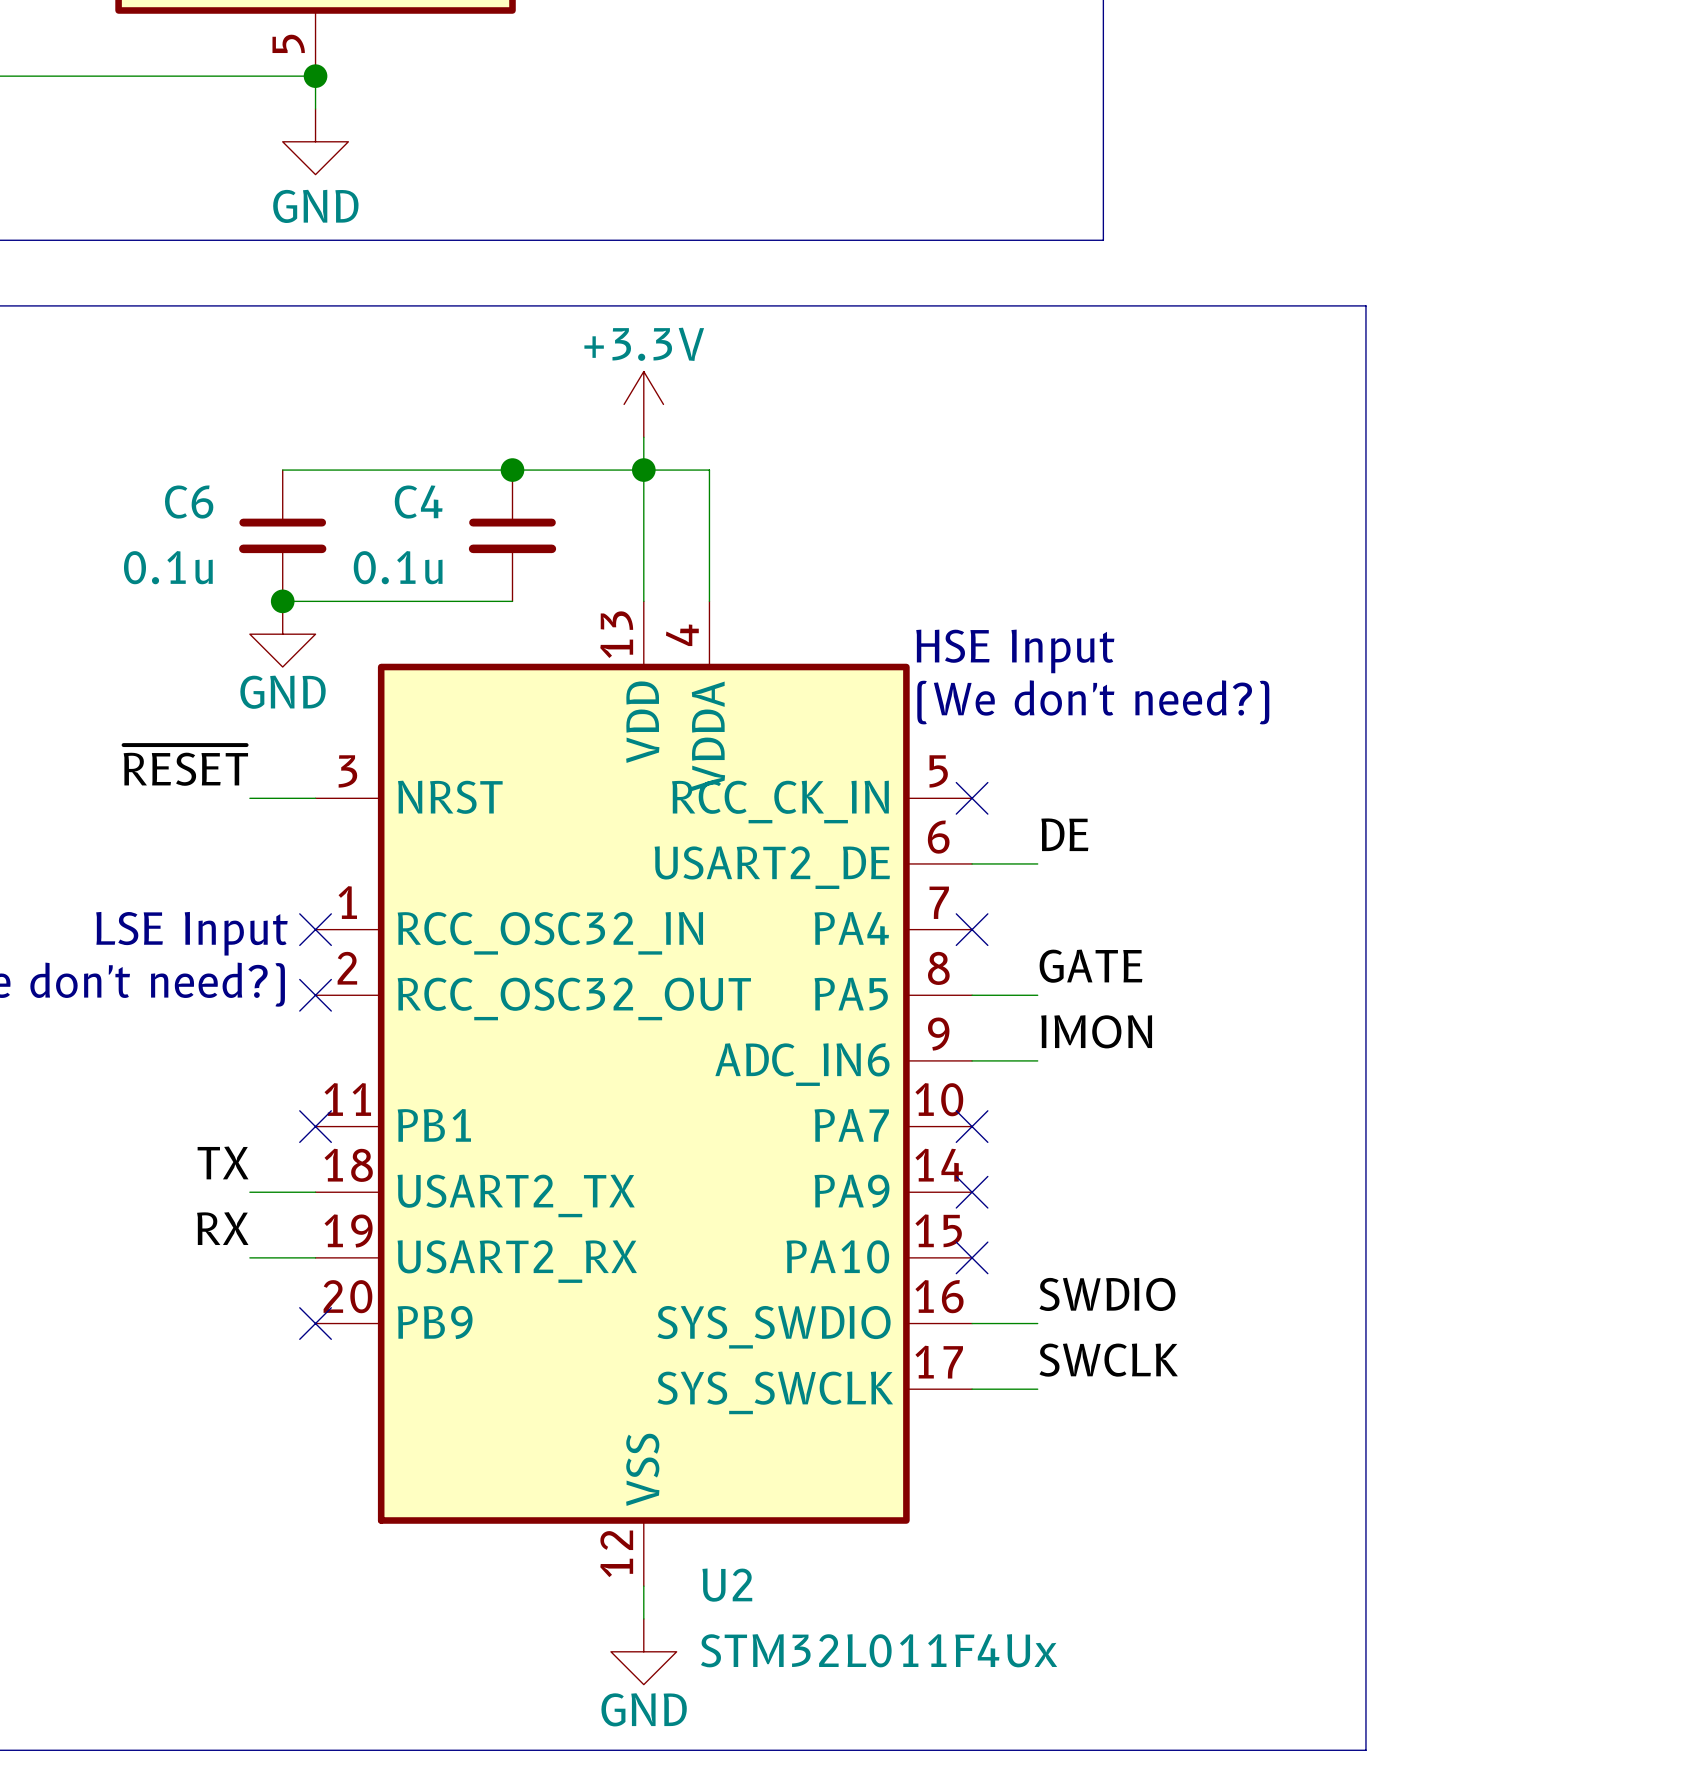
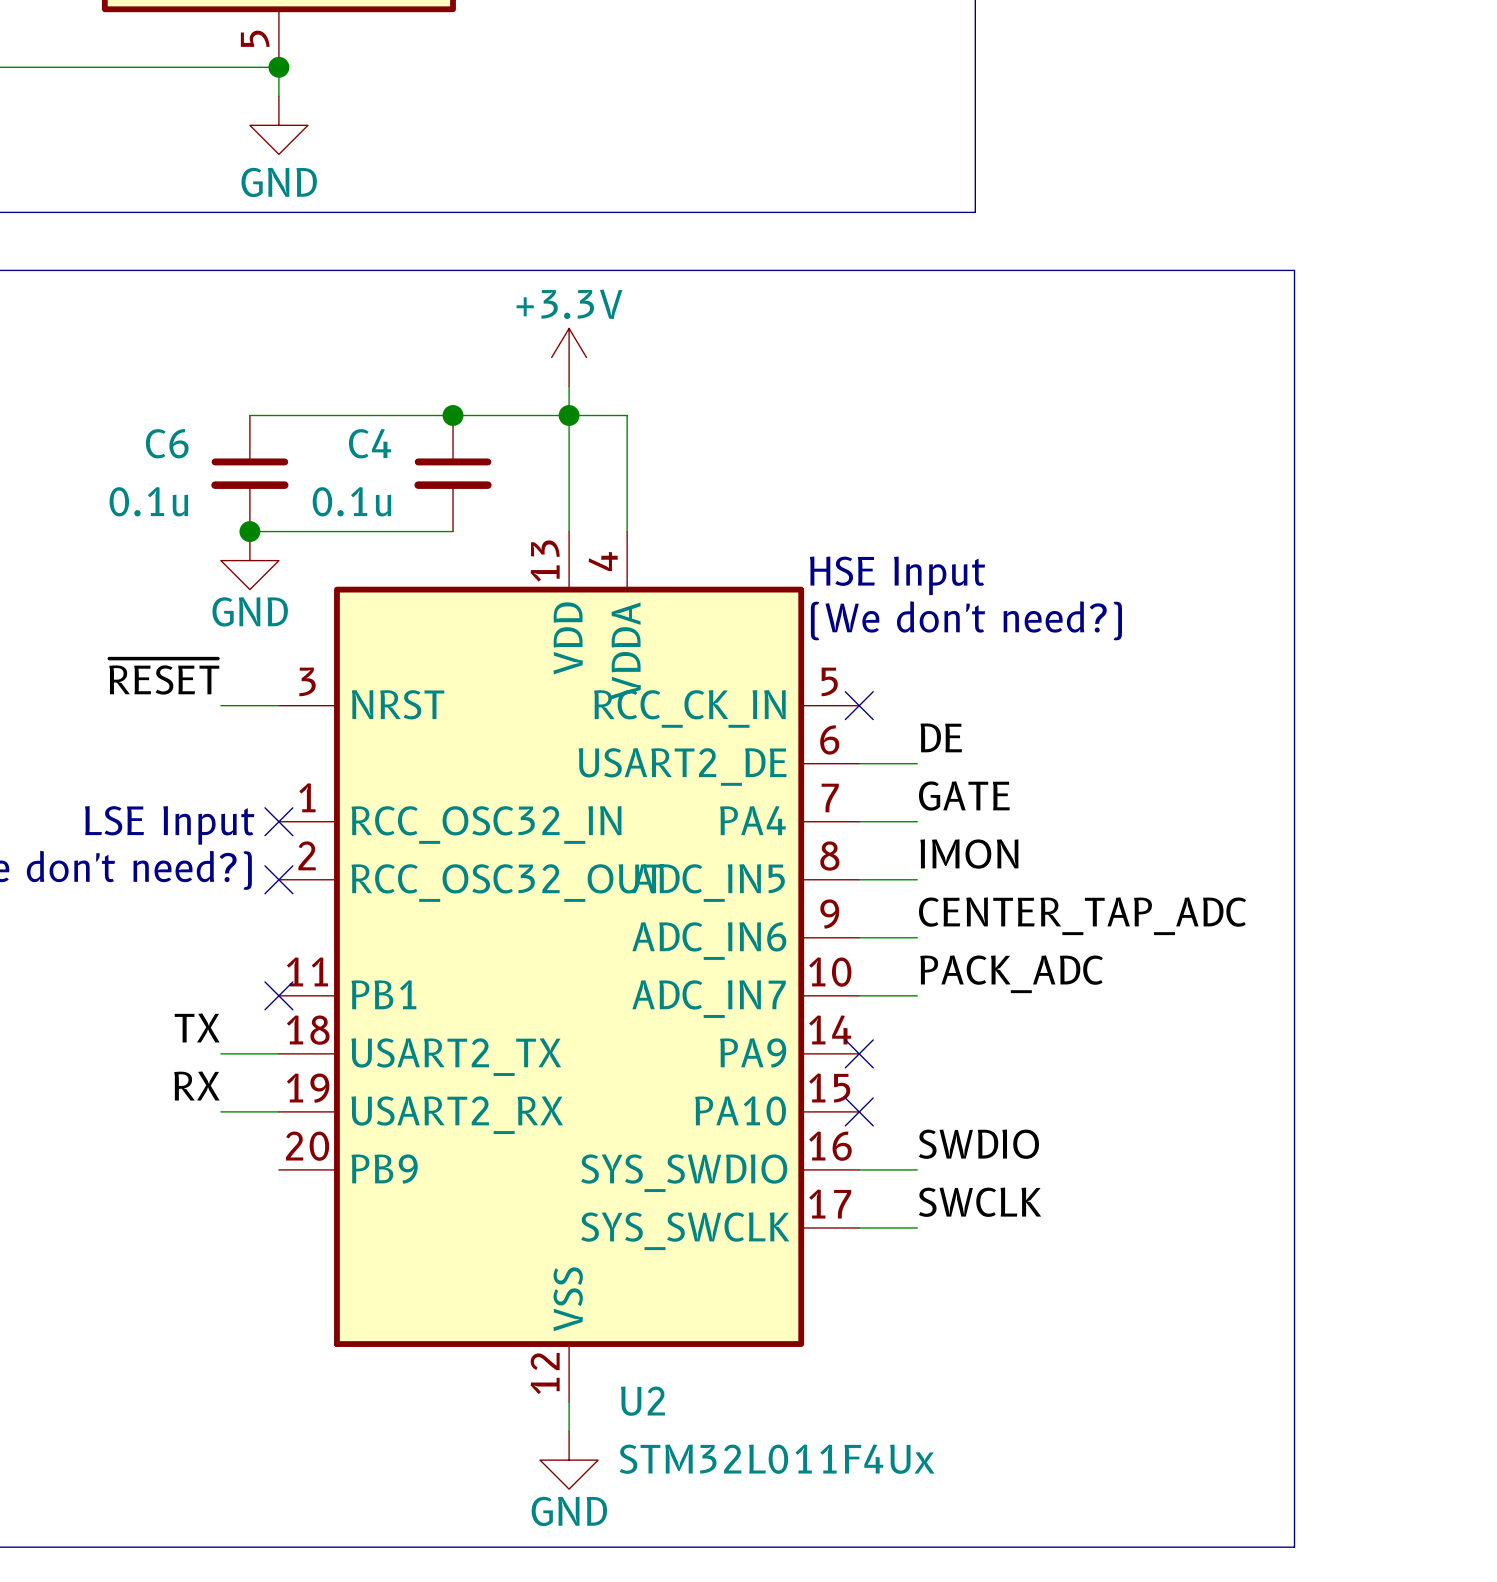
line: (1365, 305) (1365, 1750) -> (1207, 270) (1294, 270) (1294, 1547) (1207, 1547)
label: none -> GATE (964, 796)
wire: none -> (859, 821) (917, 821)
no-connect mark: (972, 929) -> none
label: GATE (1090, 966) -> IMON (969, 854)
U2 pin name: PA5 (851, 994) -> ADC_IN5 (708, 883)
label: IMON (1096, 1031) -> CENTER_TAP_ADC (1082, 916)
label: none -> PACK_ADC (1011, 974)
U2 pin name: PA7 (851, 1125) -> ADC_IN7 (709, 999)
wire: none -> (859, 995) (917, 995)
no-connect mark: (972, 1126) -> none
no-connect mark: (315, 1323) -> none

